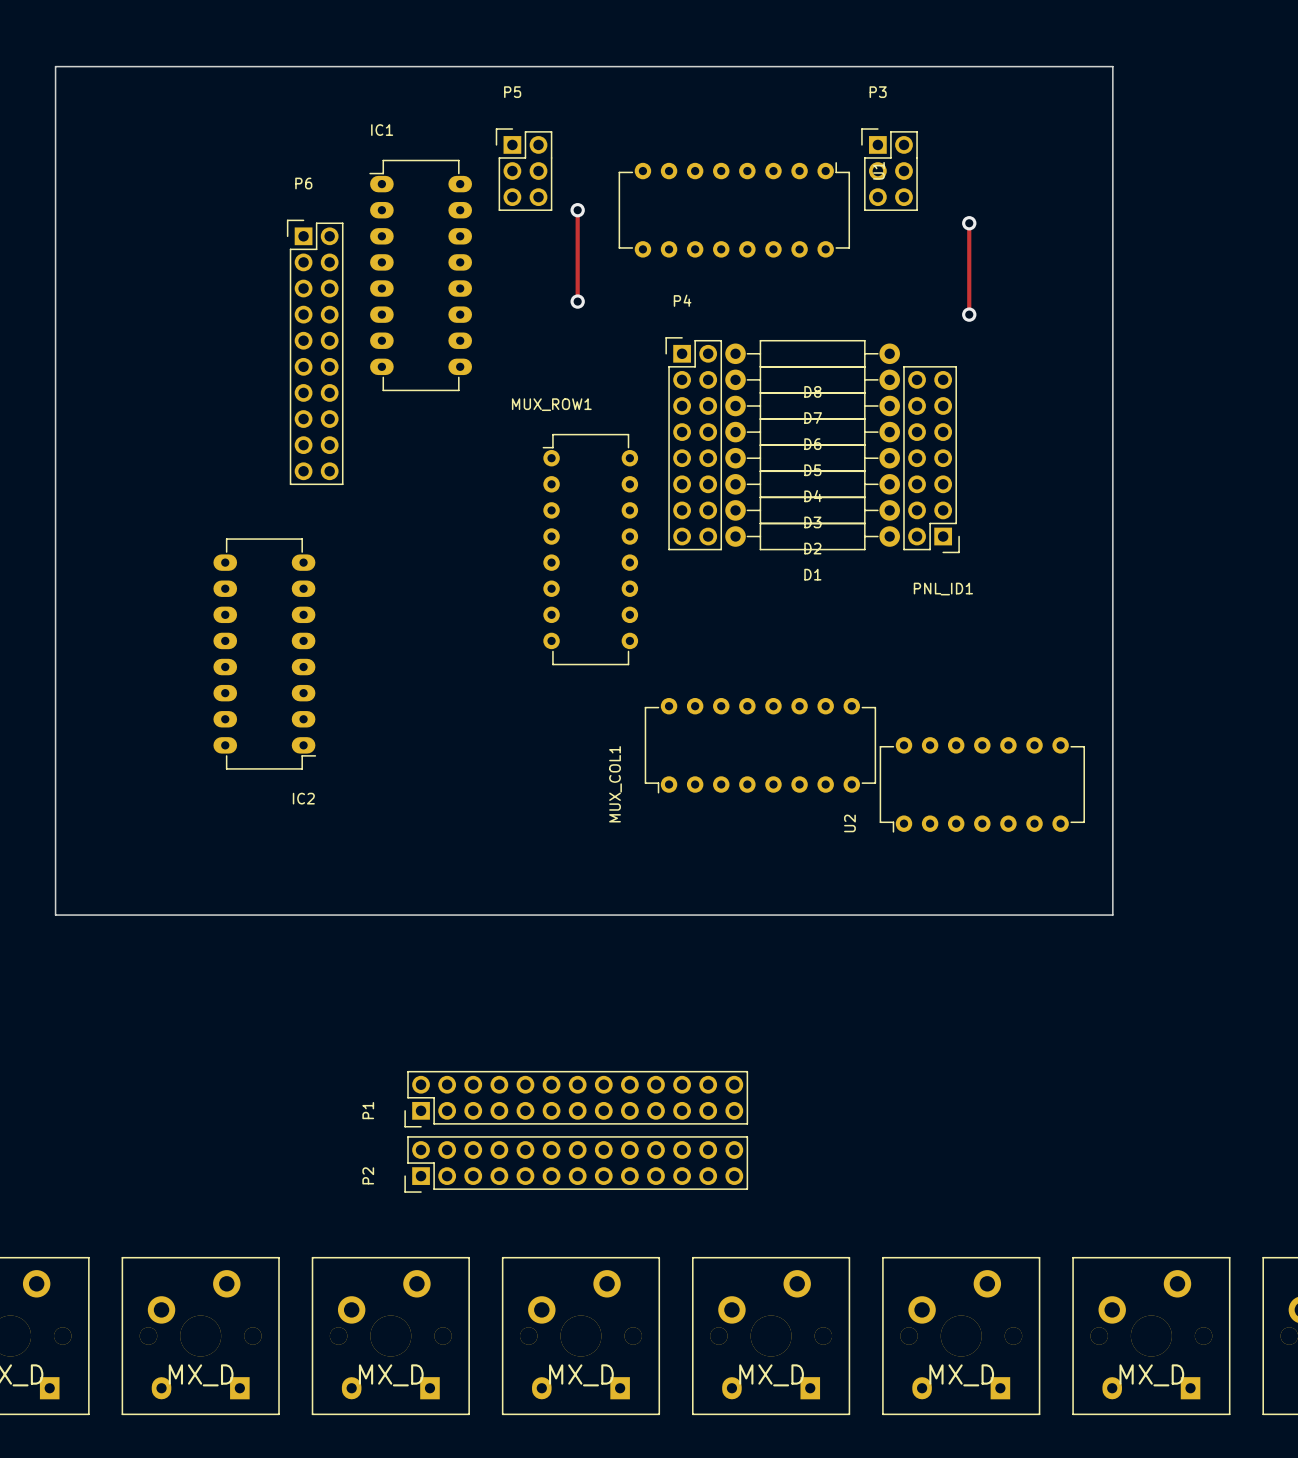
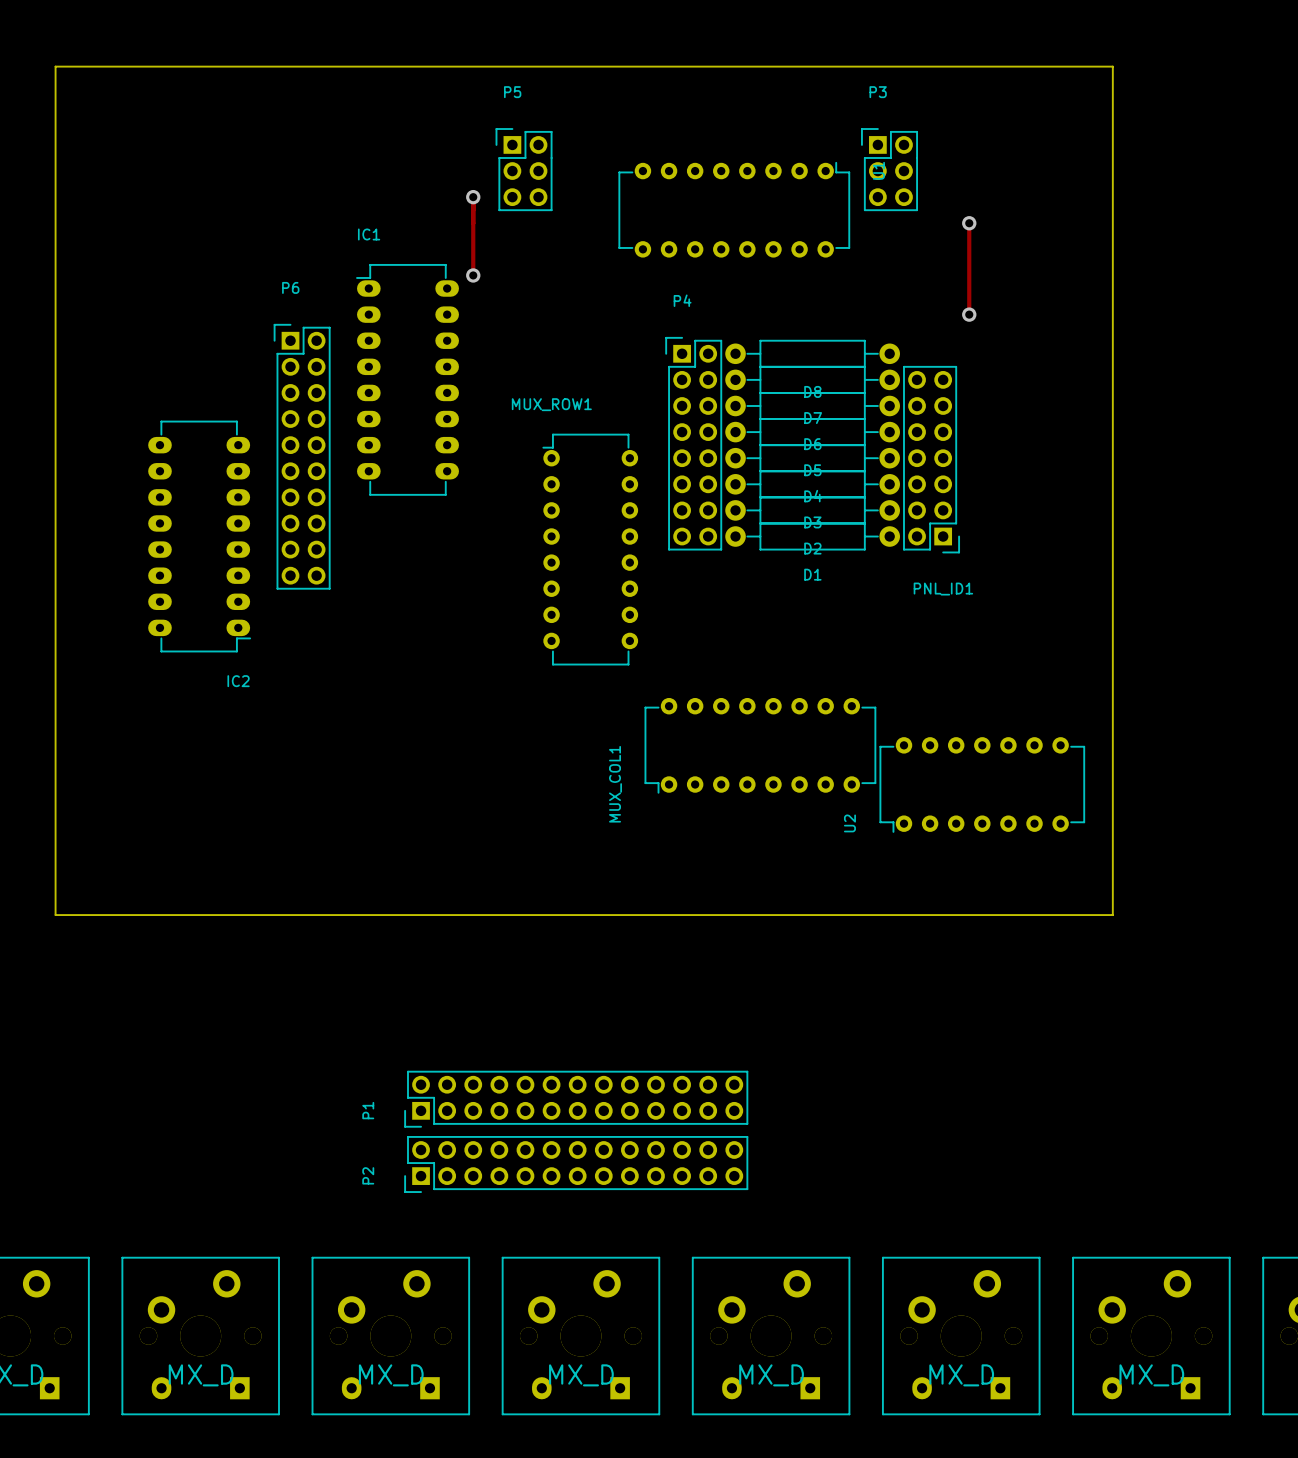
track: none -> (473, 197) (473, 275)
via: none -> (473, 197)
track: (577, 210) (577, 301) -> none
via: (577, 210) -> none
IC1 position: (420, 275) -> (407, 379)
via: none -> (473, 275)
via: (577, 301) -> none
P6 position: (315, 352) -> (302, 456)
IC2 position: (264, 653) -> (199, 536)

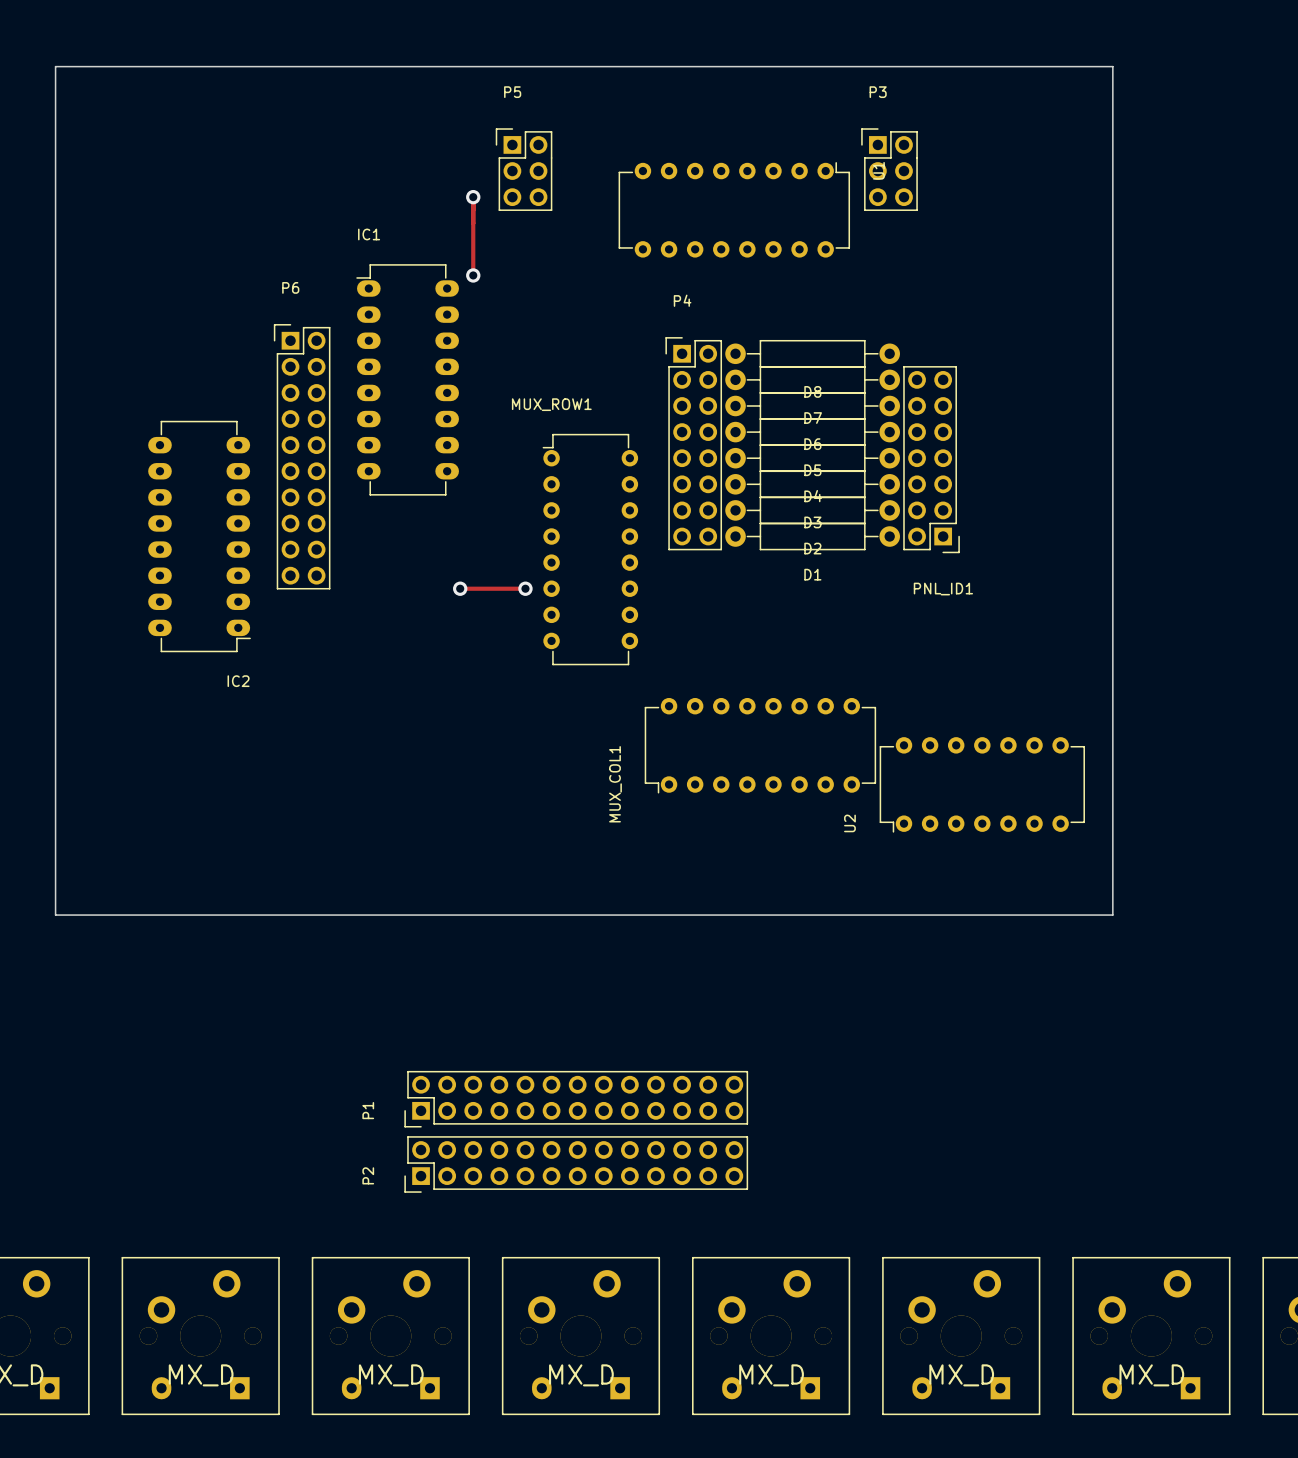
track: (969, 223) (969, 314) -> none
via: (969, 223) -> none
via: (969, 314) -> none
track: none -> (460, 588) (525, 588)
via: none -> (460, 588)
via: none -> (525, 588)

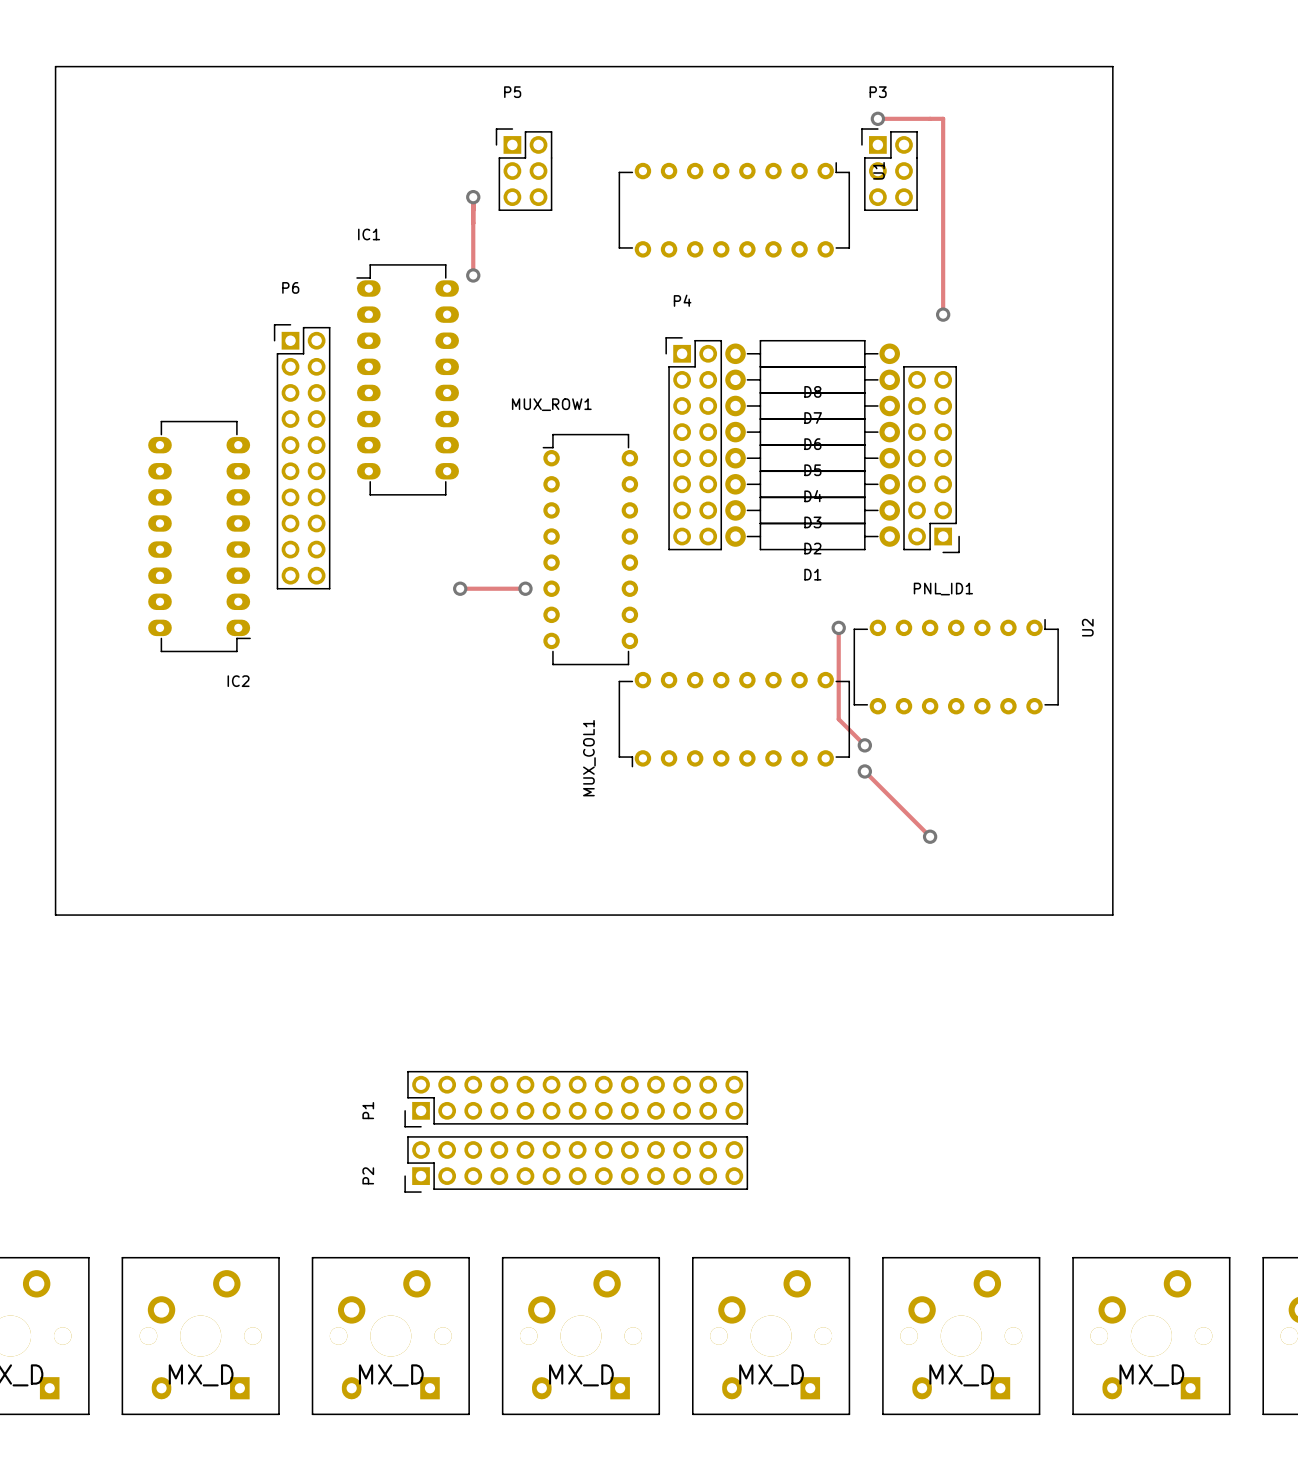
track: none -> (877, 118) (943, 118) (943, 314)
via: none -> (877, 118)
via: none -> (943, 314)
track: none -> (838, 627) (838, 719) (864, 745)
via: none -> (838, 627)
MUX_COL1 position: (760, 745) -> (734, 719)
via: none -> (864, 745)
track: none -> (864, 771) (930, 836)
via: none -> (864, 771)
U2 rotation: 0° (982, 784) -> 180° (956, 666)
via: none -> (930, 836)

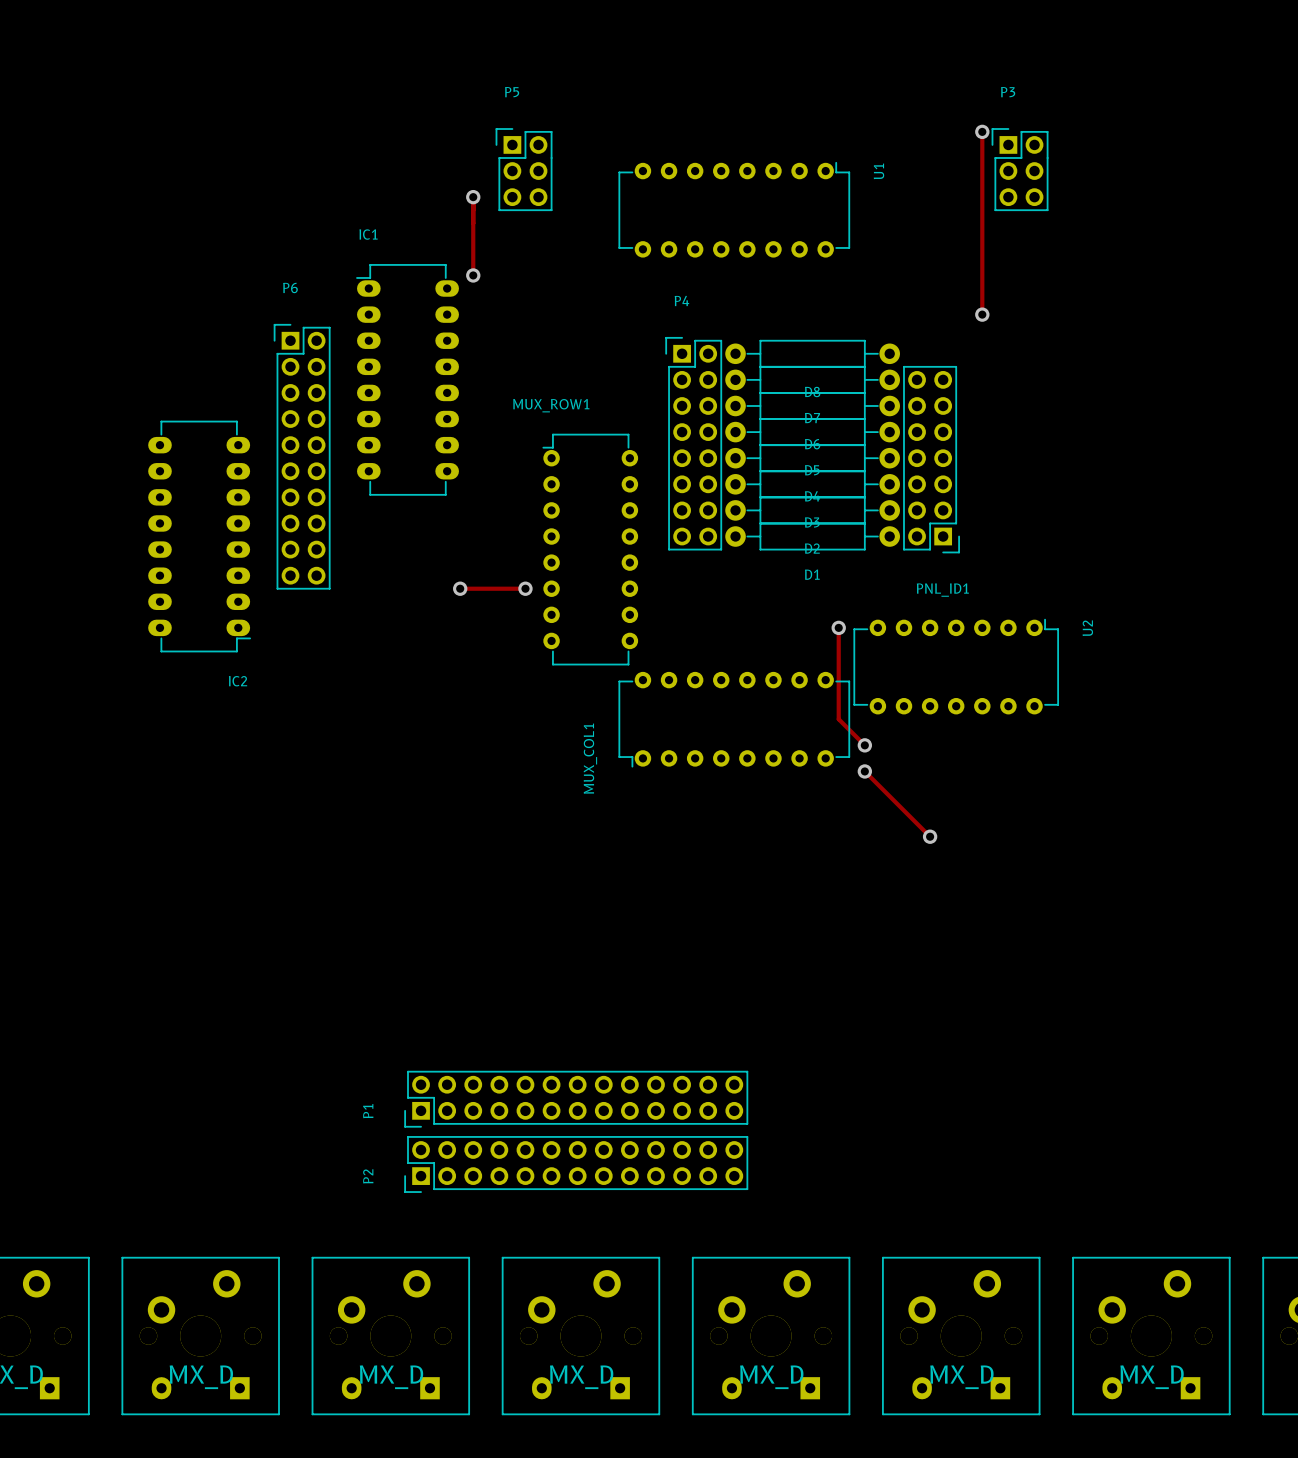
board edge: (55, 66) (1112, 66) (1112, 915) (55, 915) (55, 66) -> none
track: (877, 118) (943, 118) (943, 314) -> none
via: (877, 118) -> none
track: none -> (982, 131) (982, 314)
via: none -> (982, 131)
P3 position: (889, 169) -> (1020, 169)
via position: (943, 314) -> (982, 314)

